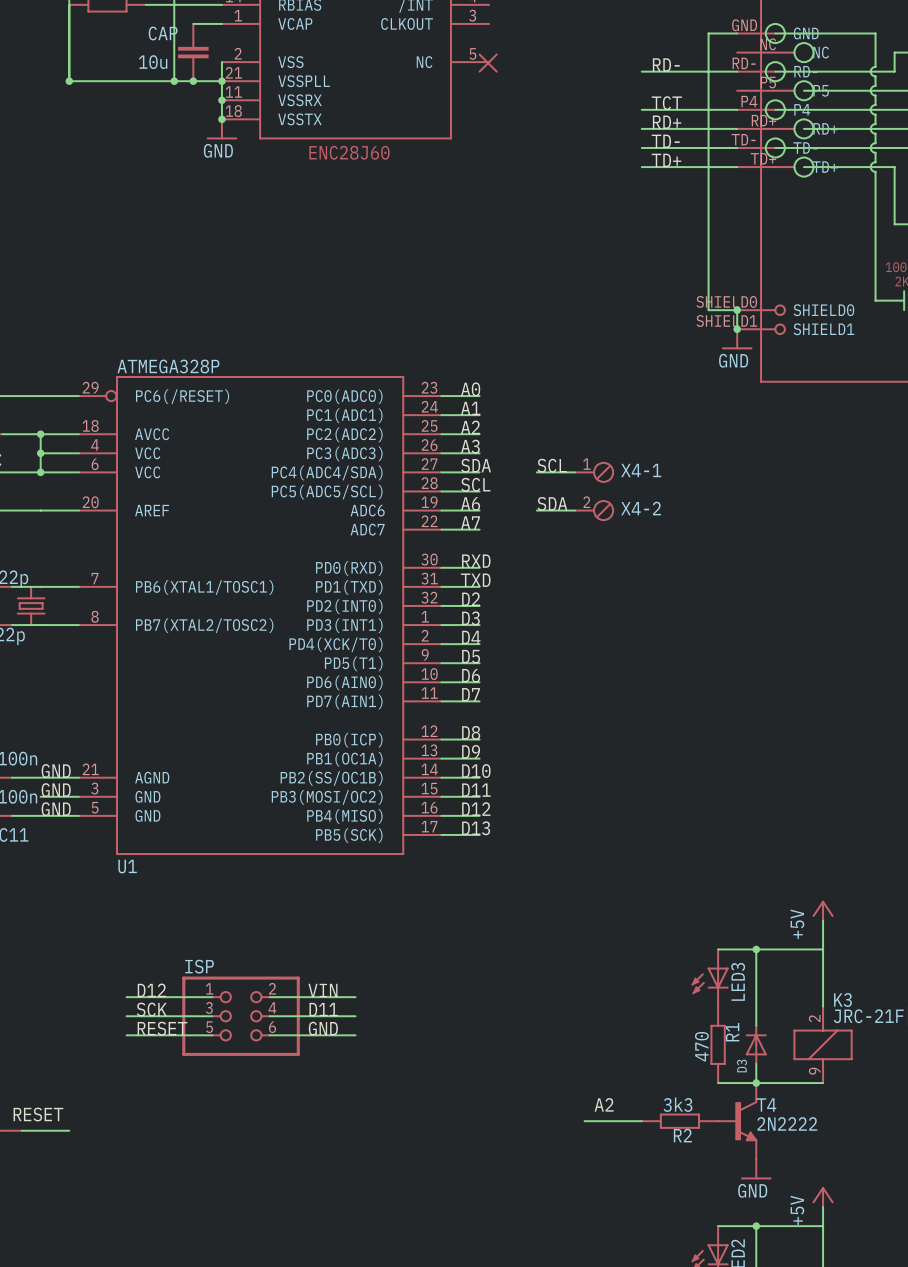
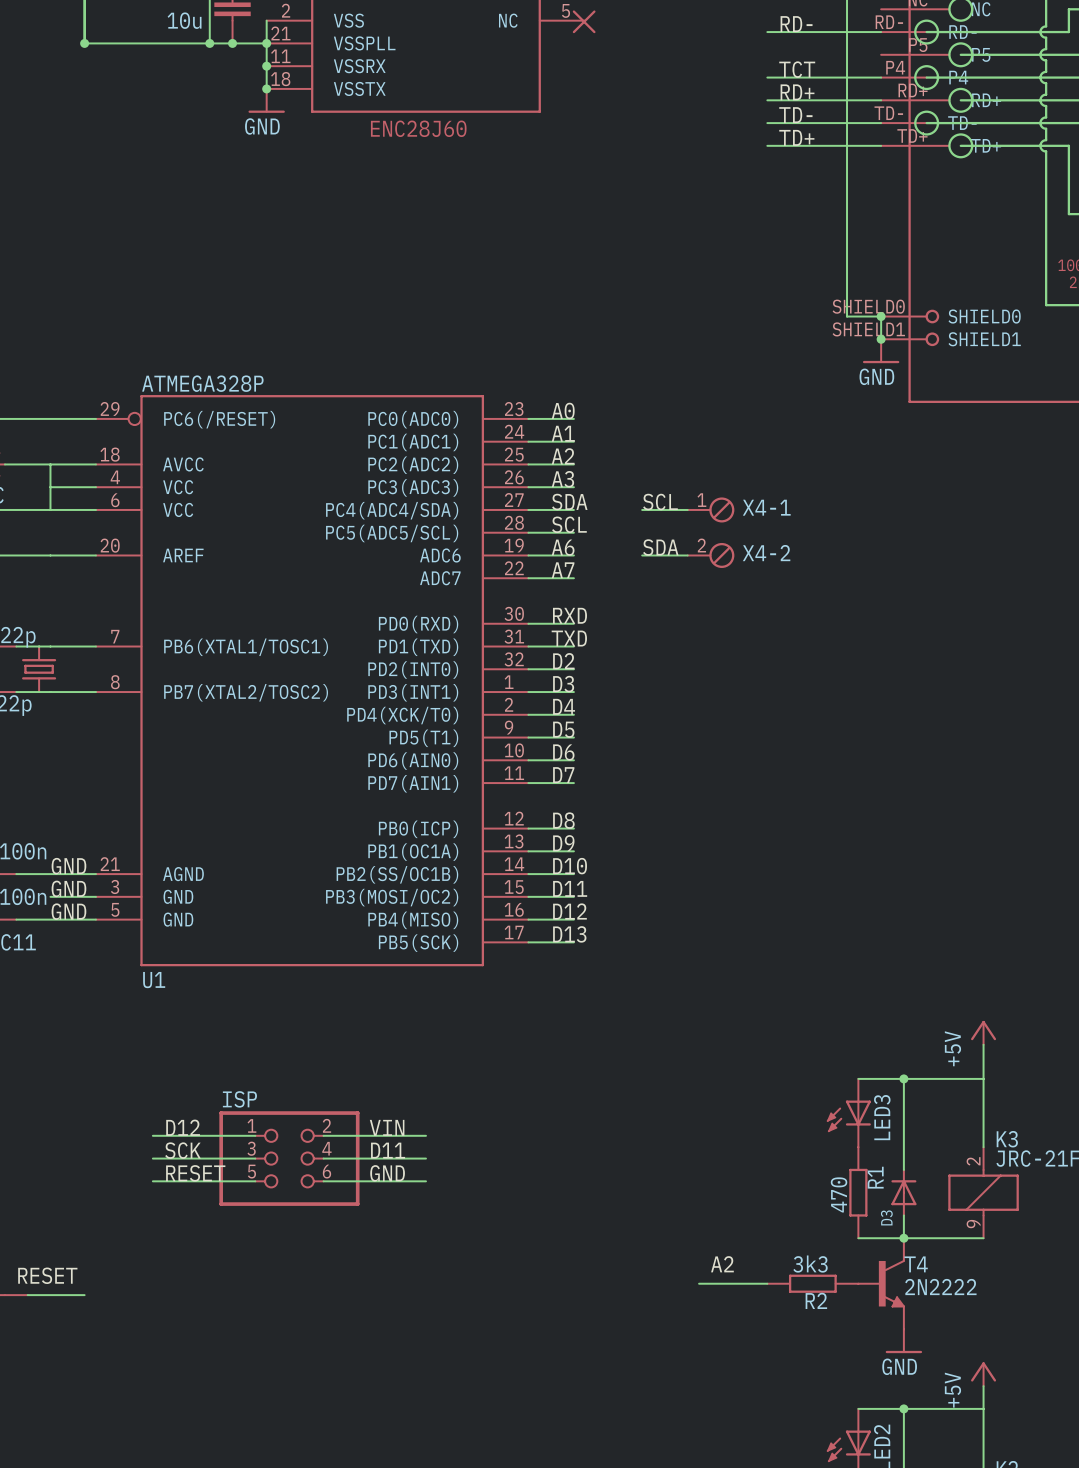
junction: (40, 434) -> none
junction: (40, 453) -> none
junction: (40, 472) -> none

